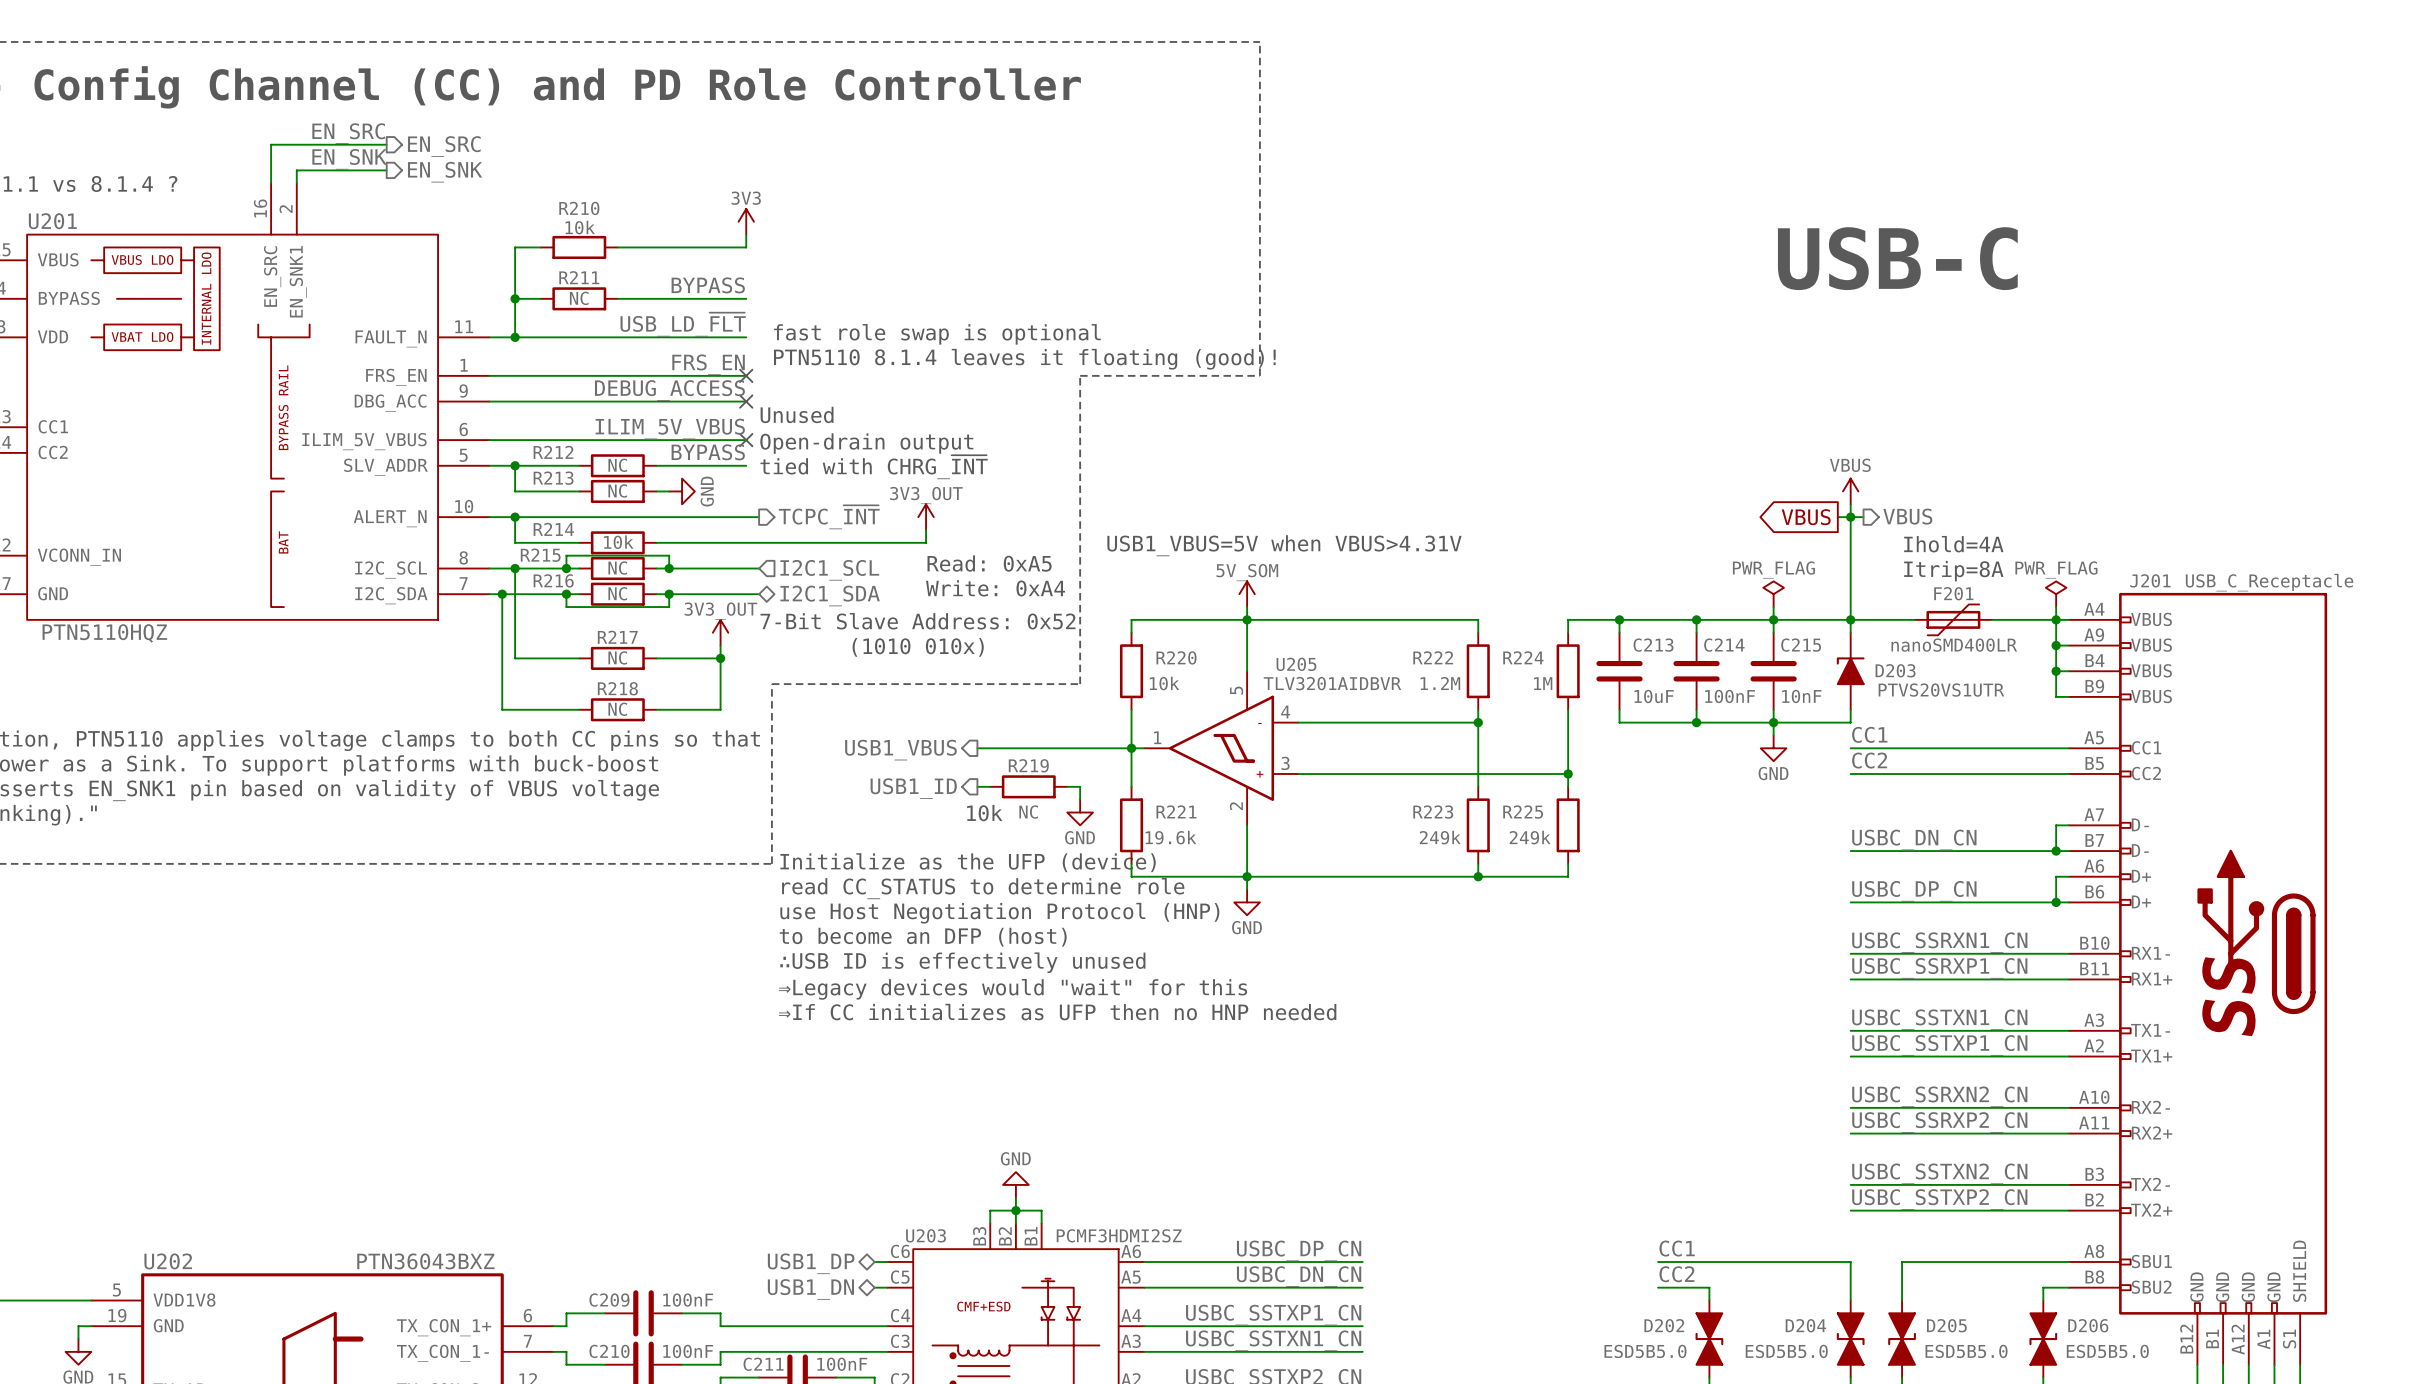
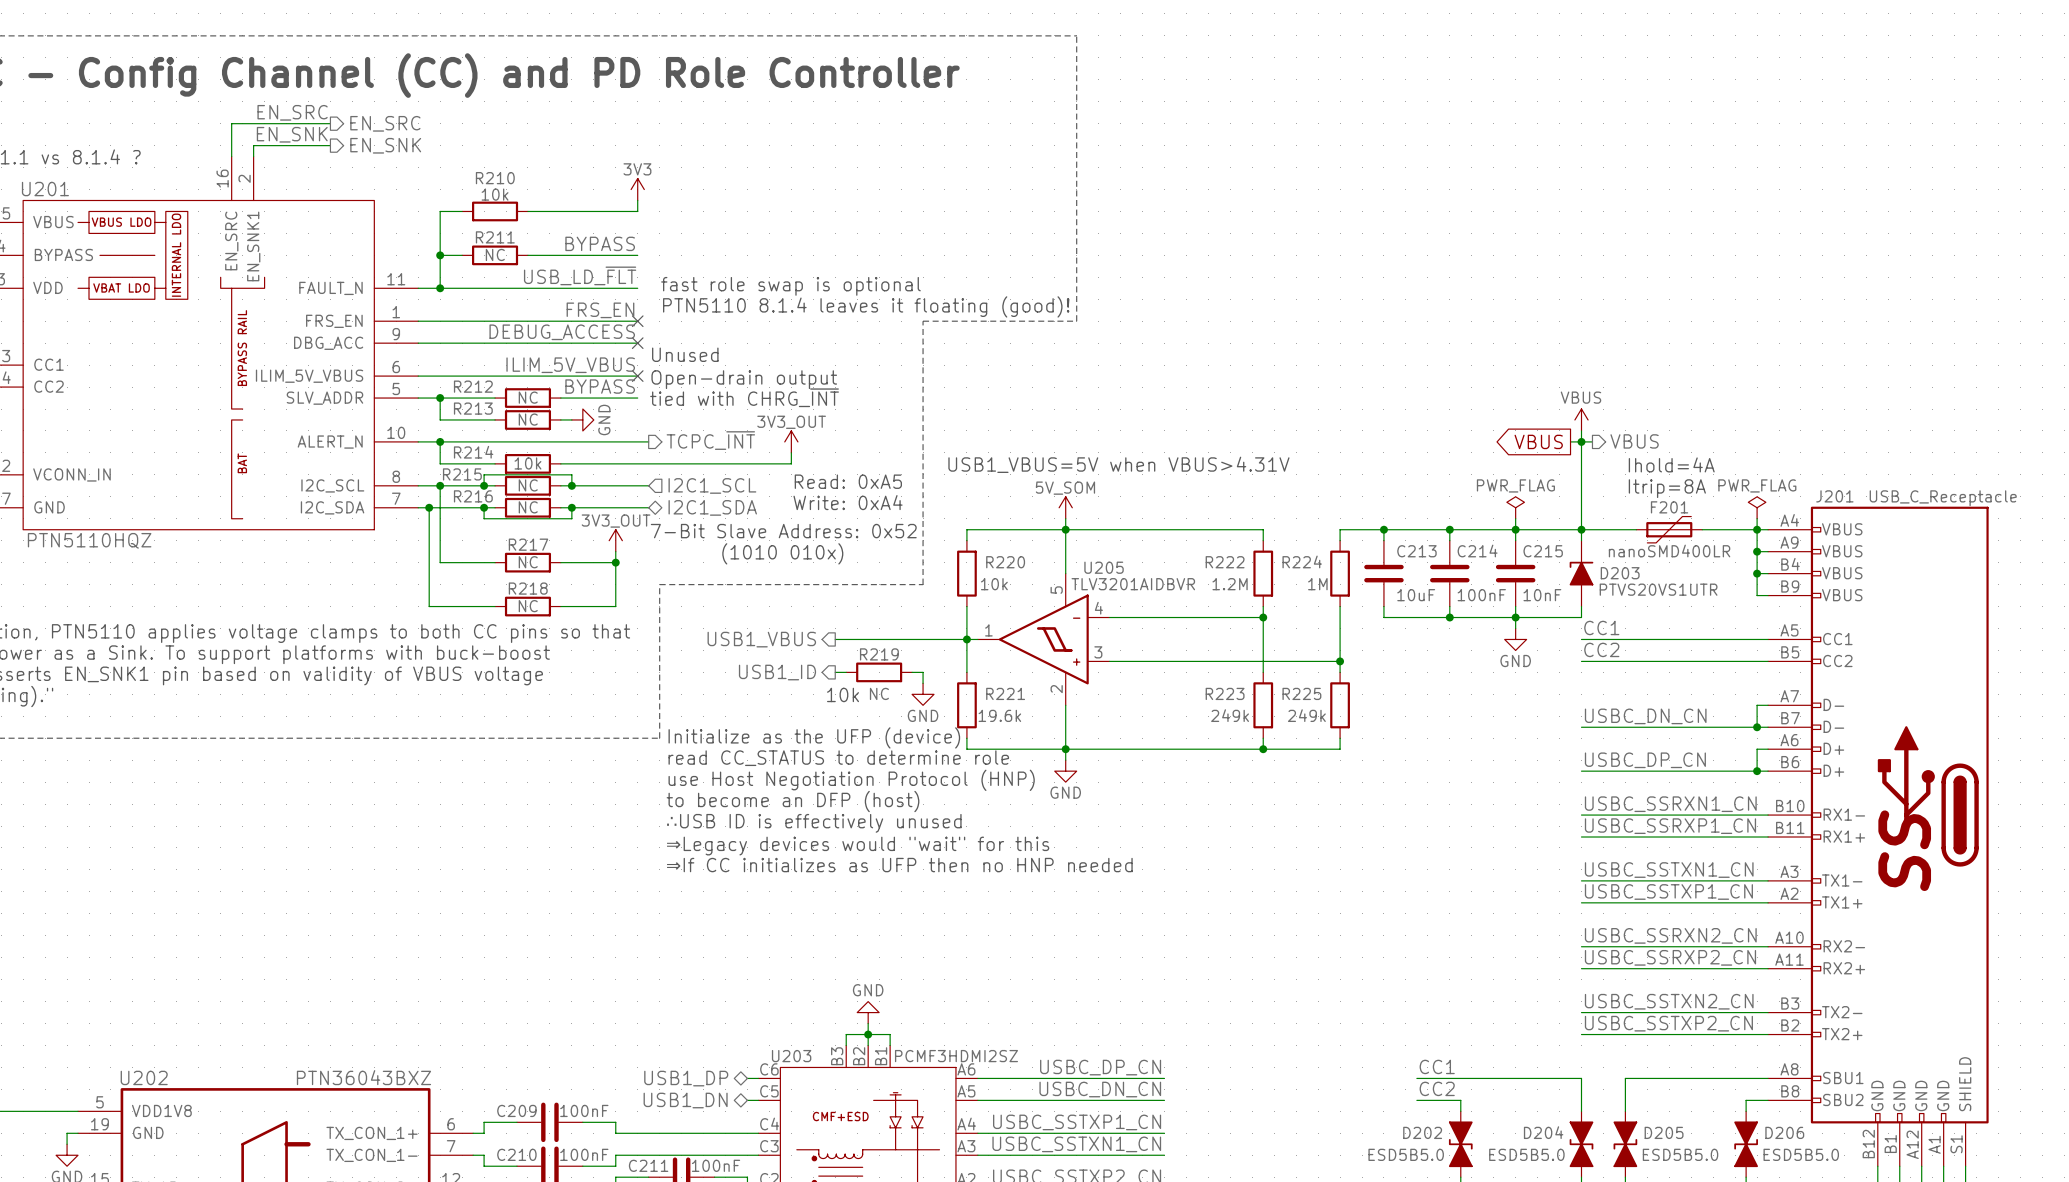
text: USB-C (1897, 258) -> none

